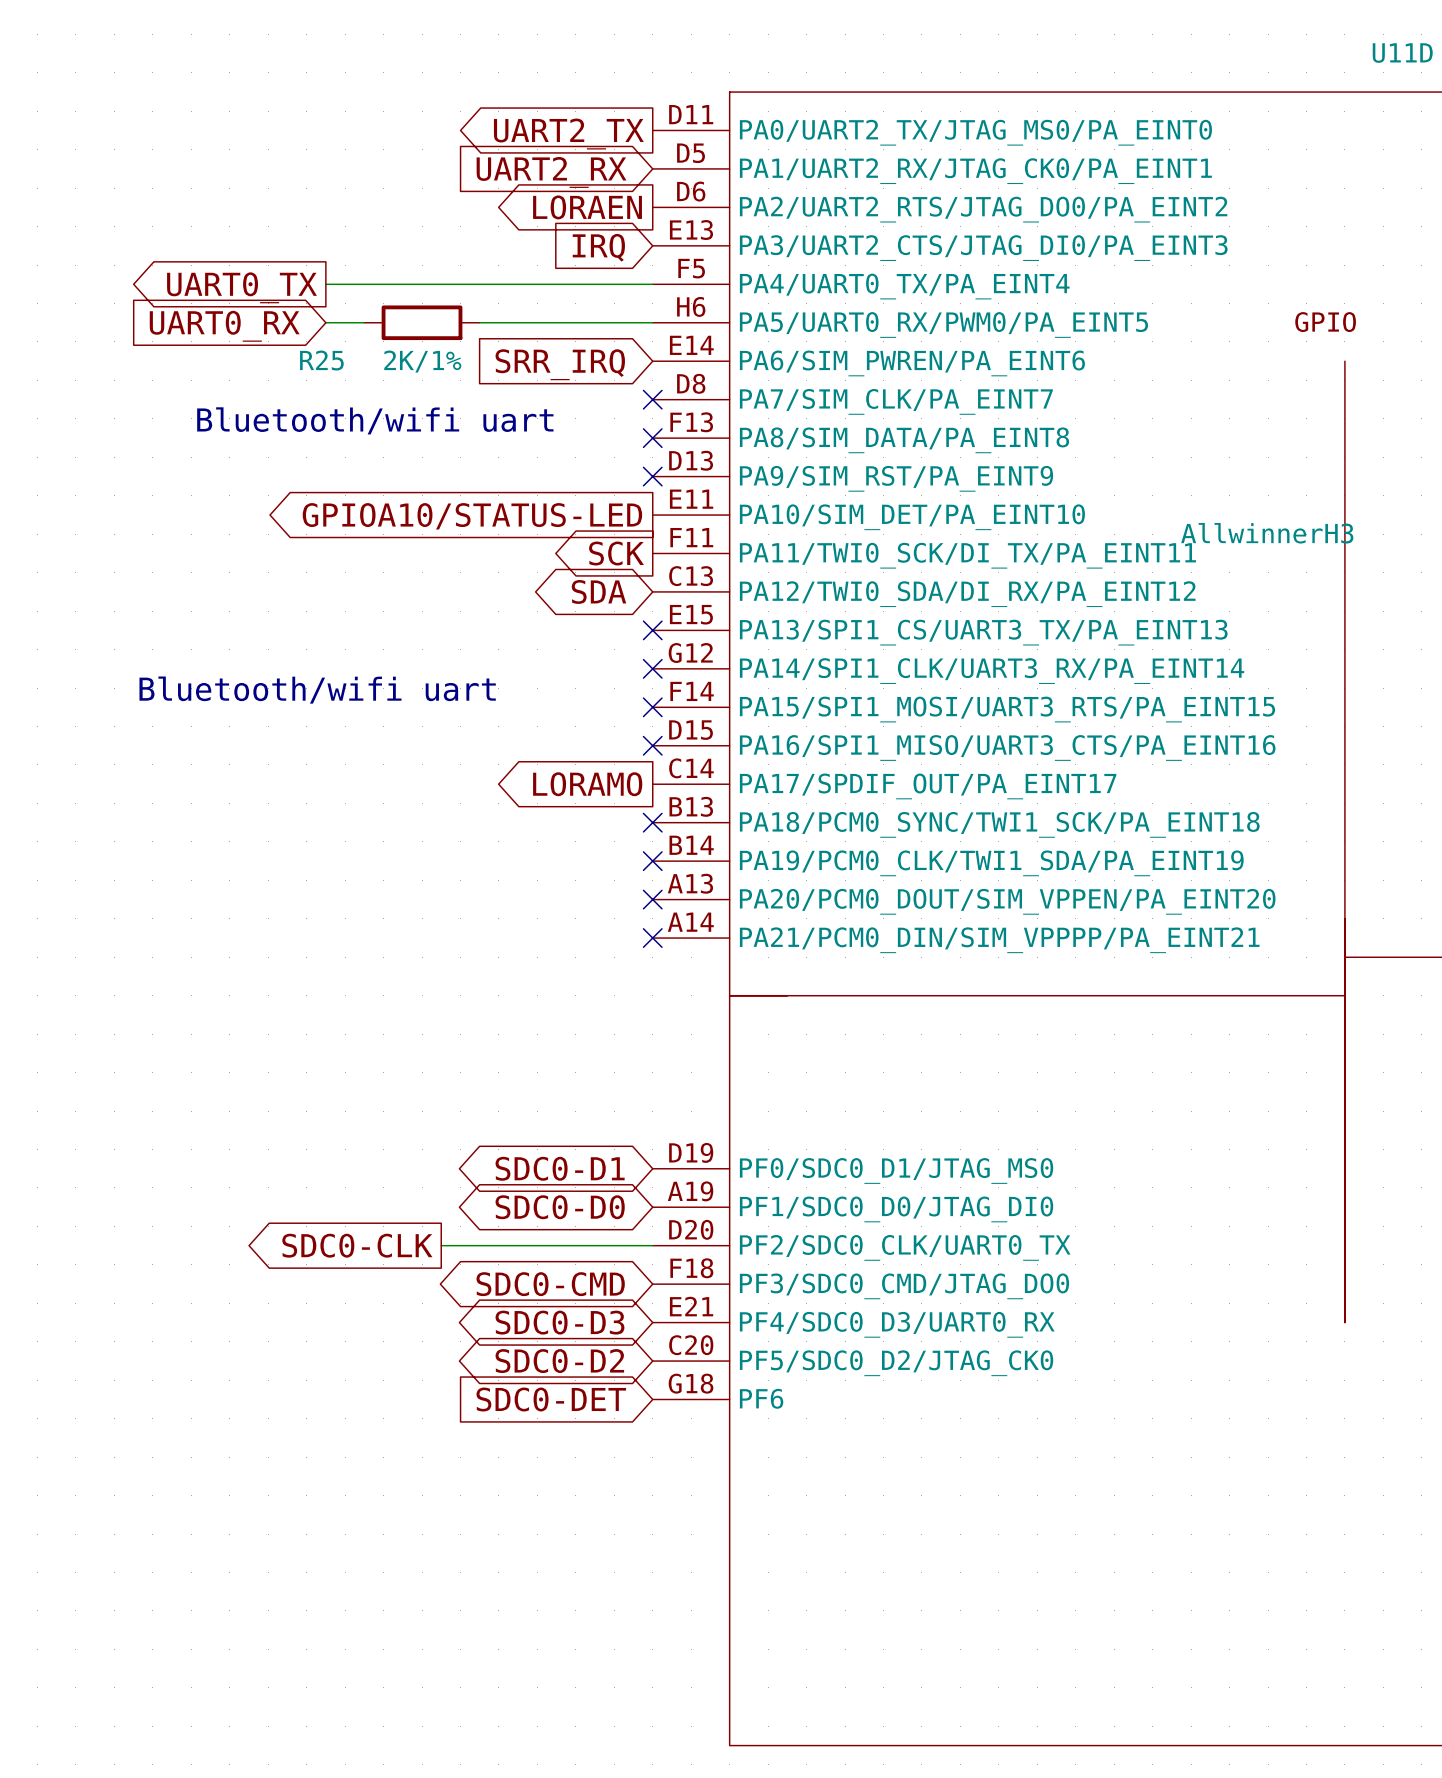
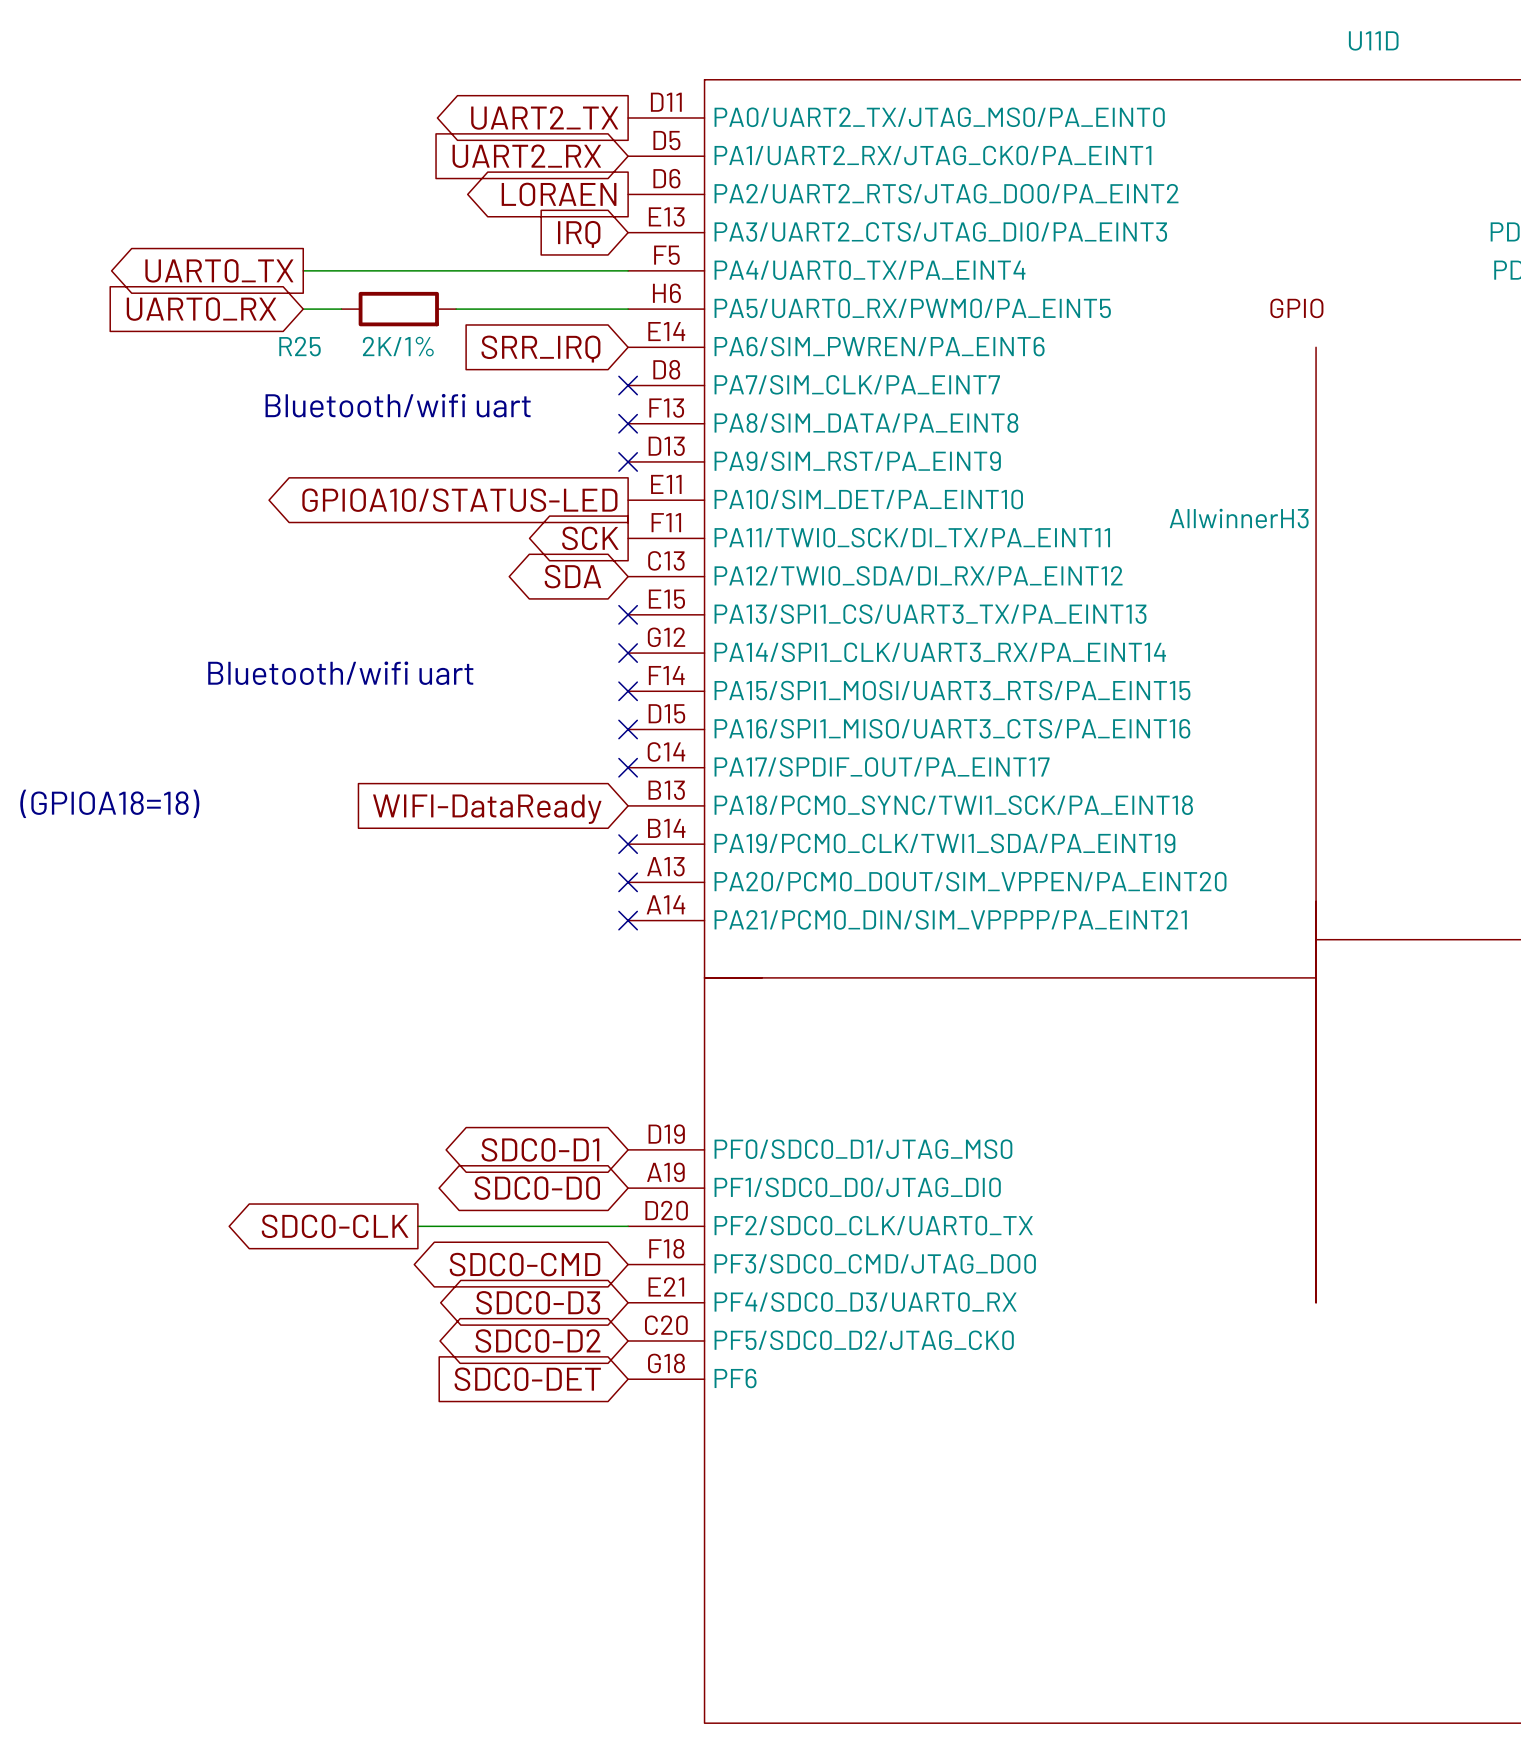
global label: LORAMO (587, 784) -> none
text: none -> (GPIOA18=18) (109, 803)
no-connect mark position: (652, 822) -> (628, 767)
global label: none -> WIFI-DataReady (487, 809)

